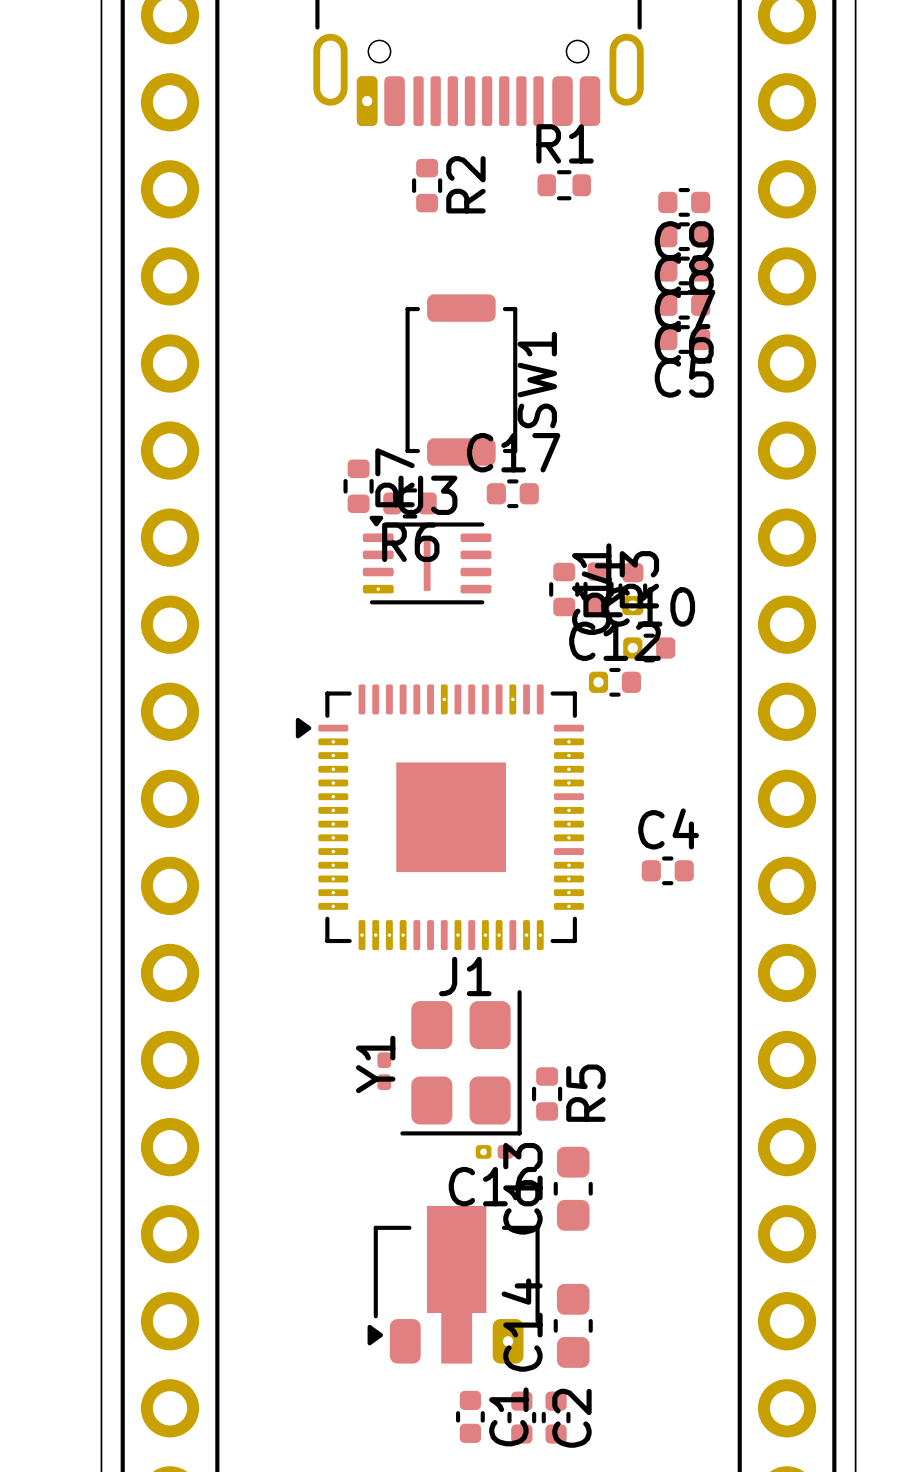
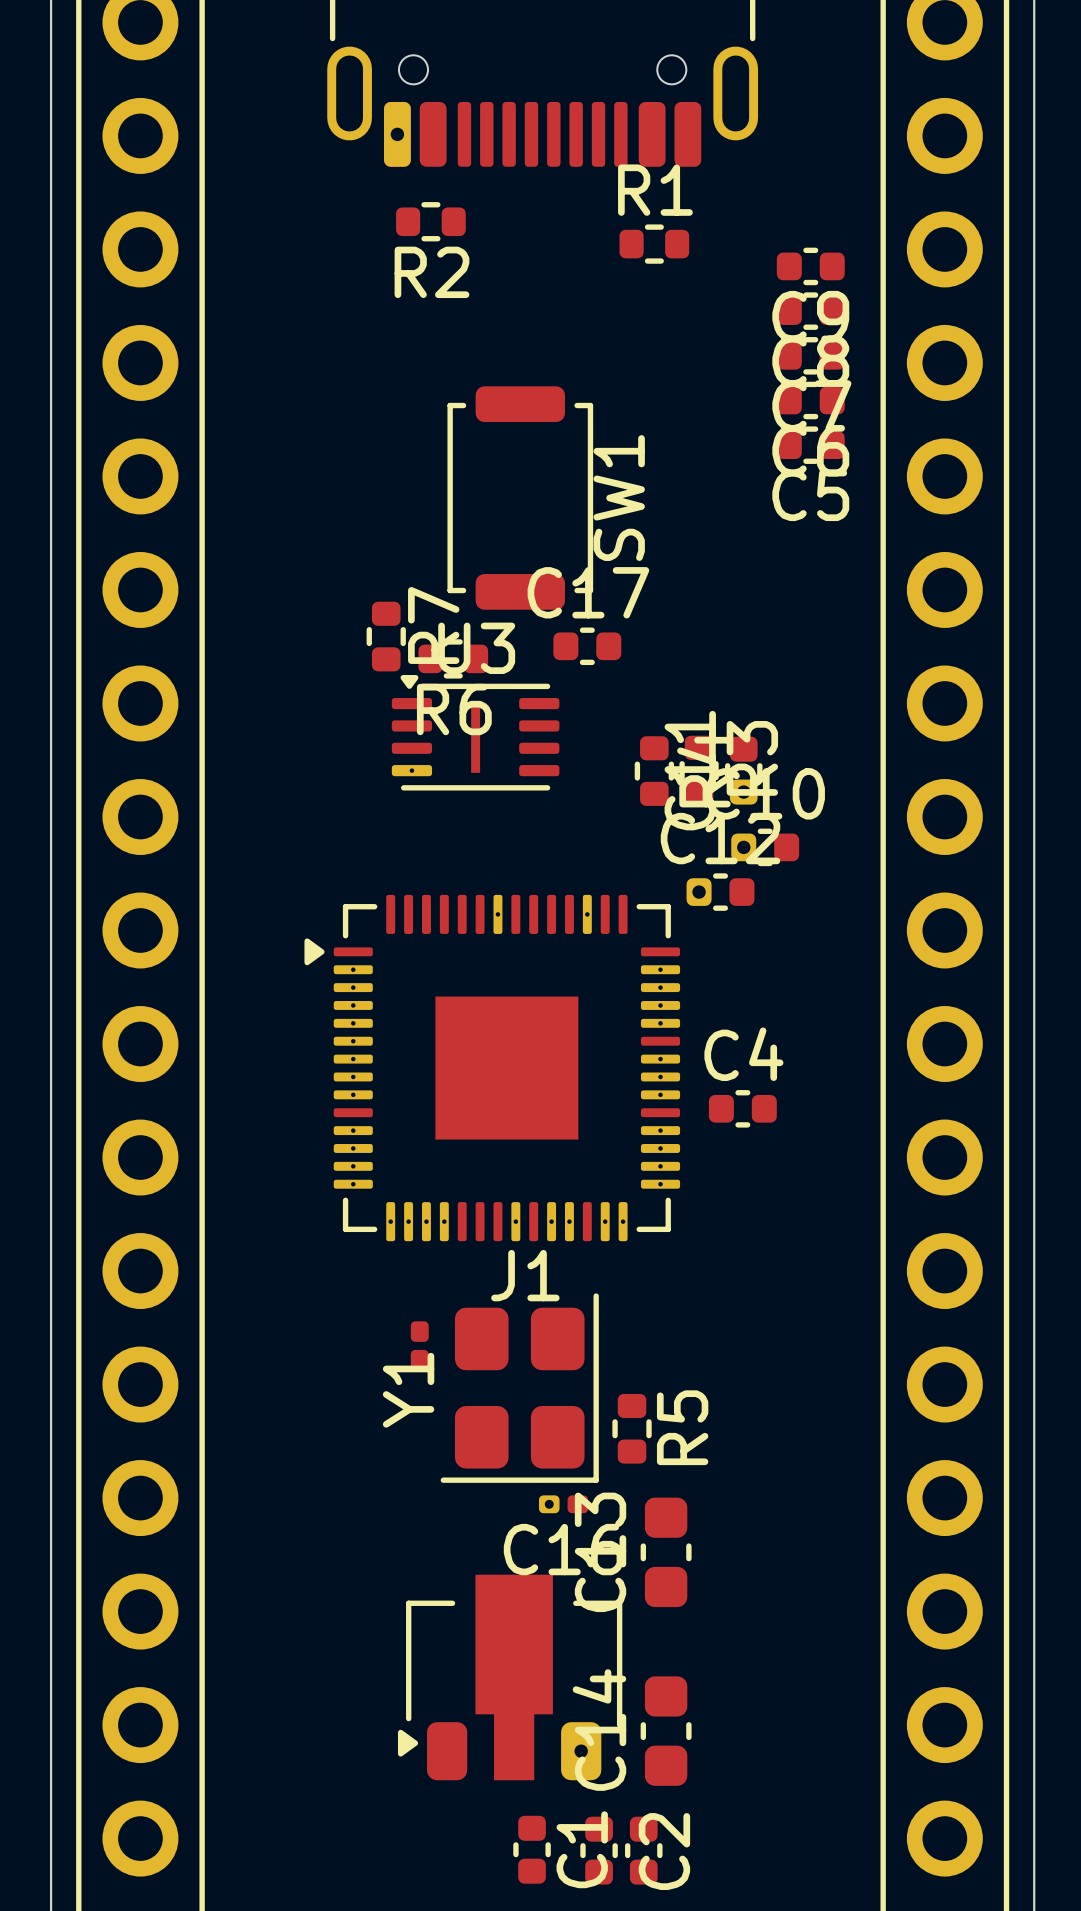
R2 rotation: 0° (427, 185) -> 90° clockwise (430, 221)
R2 position: (427, 185) -> (430, 221)
part footprint: [295, 684, 584, 951] -> [304, 894, 681, 1242]
C4 position: (667, 870) -> (742, 1108)
part position: (384, 1071) -> (419, 1345)

